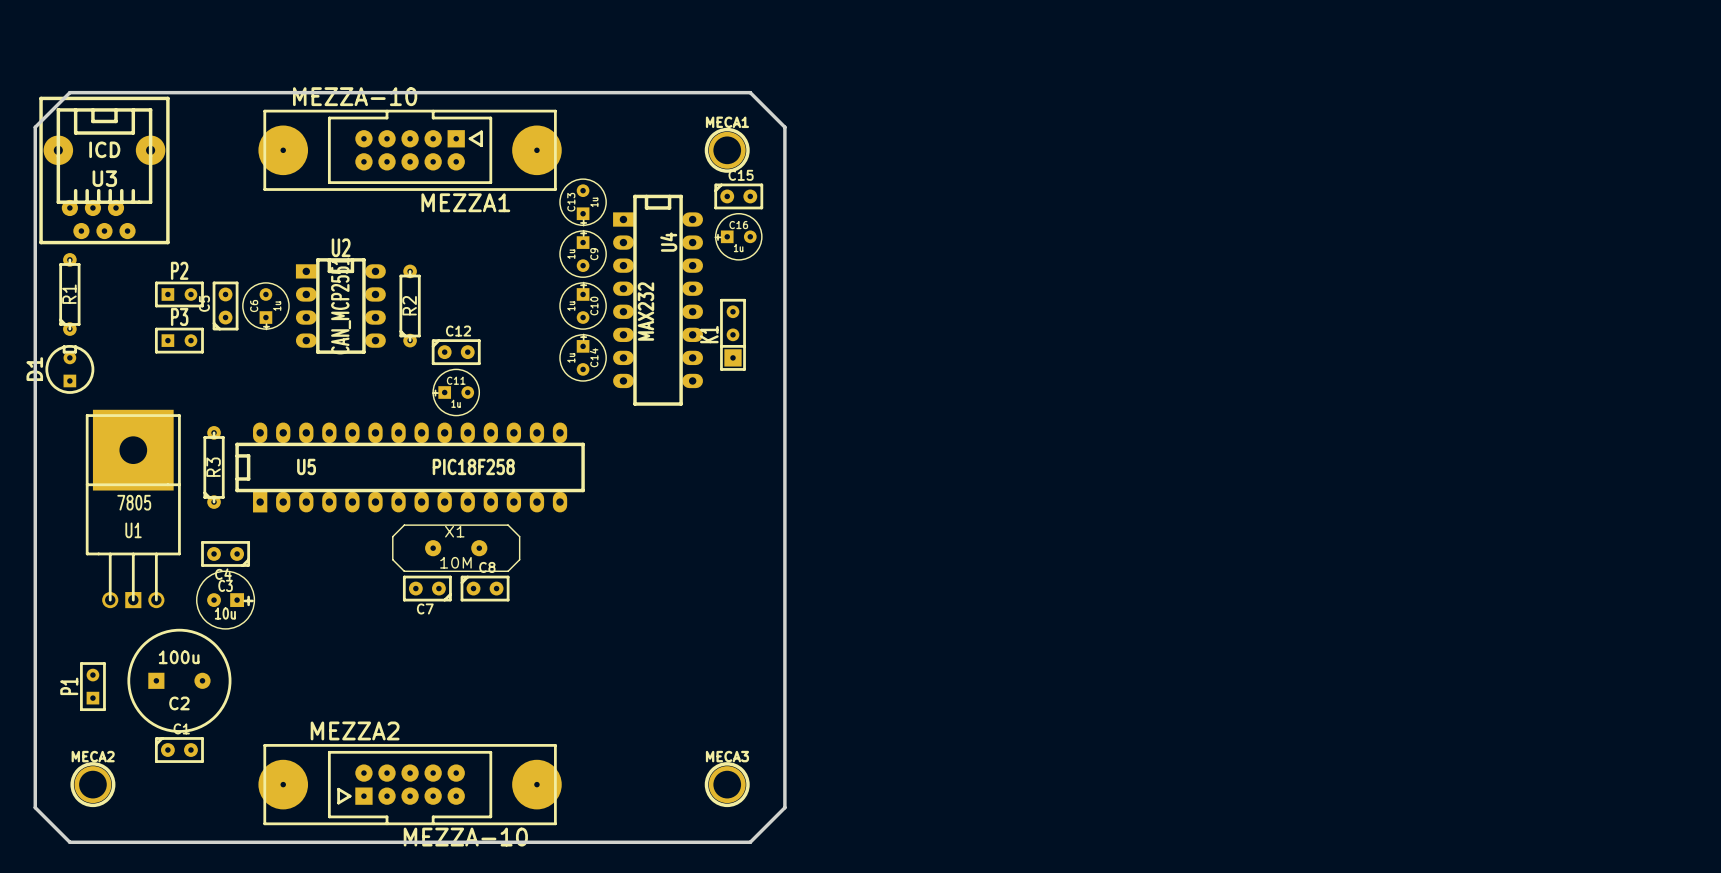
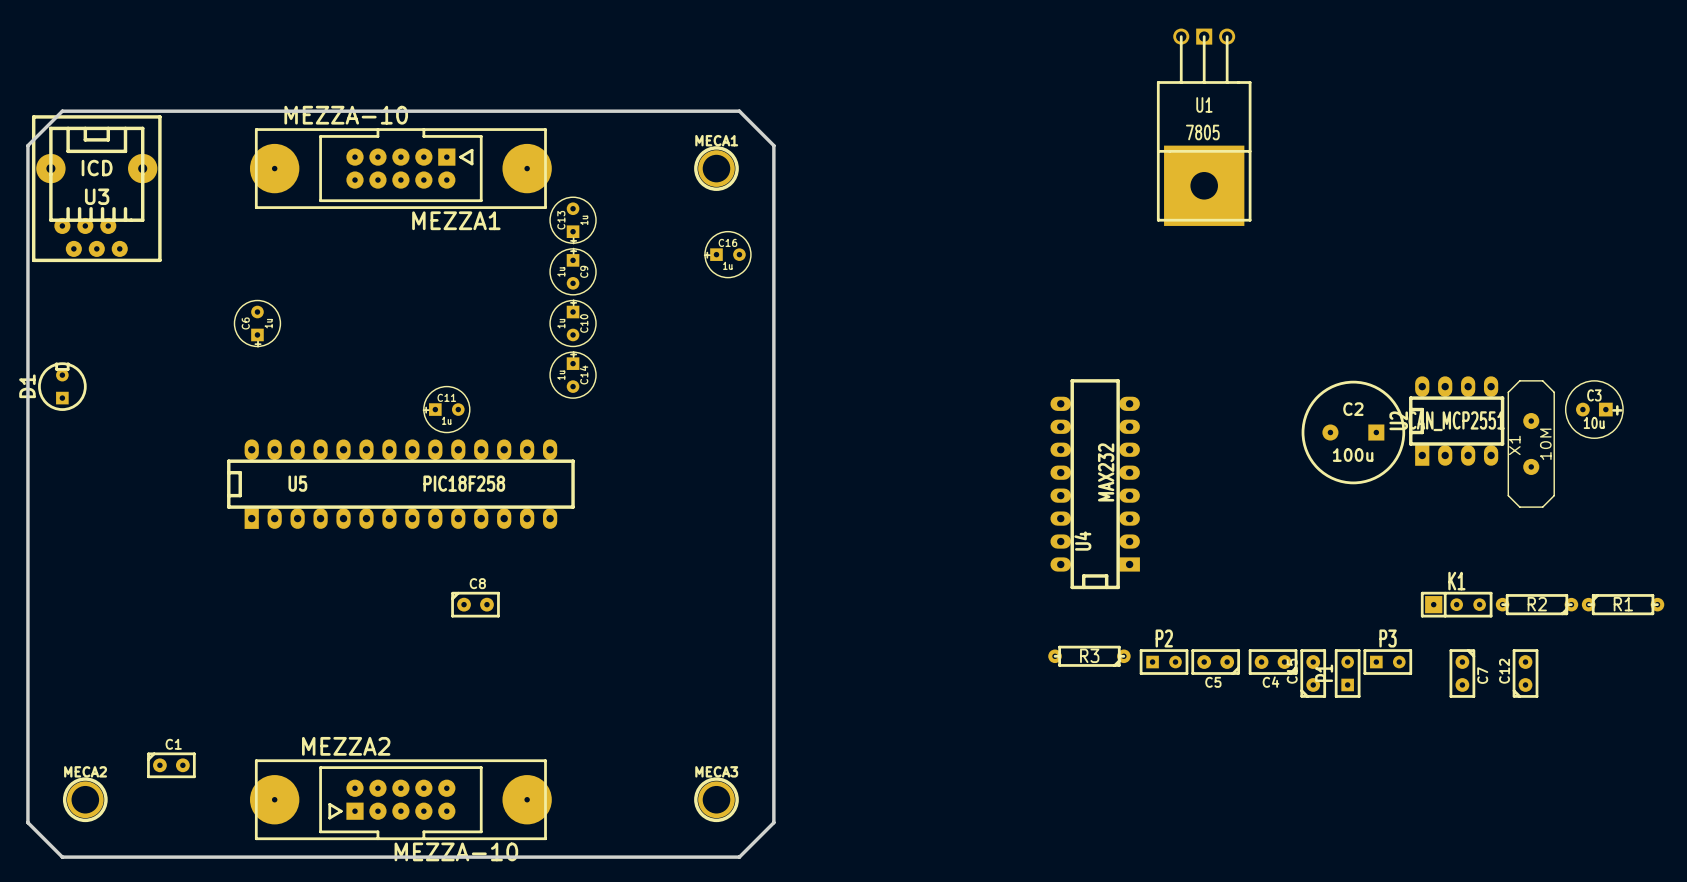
C15 rotation: 0° (738, 196) -> 90° counterclockwise (1313, 673)
C15 position: (738, 196) -> (1313, 673)
R1 rotation: 0° (69, 294) -> 90° clockwise (1623, 604)
R1 position: (69, 294) -> (1623, 604)
P2 position: (179, 294) -> (1164, 662)
U4 rotation: 0° (658, 300) -> 180° (1095, 484)
U4 position: (658, 300) -> (1095, 484)
C5 rotation: 0° (225, 306) -> 90° counterclockwise (1215, 662)
C5 position: (225, 306) -> (1215, 662)
U2 rotation: 0° (340, 306) -> 90° counterclockwise (1456, 421)
U2 position: (340, 306) -> (1456, 421)
R2 rotation: 0° (410, 306) -> 90° counterclockwise (1537, 604)
R2 position: (410, 306) -> (1537, 604)
K1 rotation: 0° (733, 334) -> 90° clockwise (1456, 604)
K1 position: (733, 334) -> (1456, 604)
P3 position: (179, 340) -> (1387, 662)
C12 rotation: 0° (456, 352) -> 90° counterclockwise (1525, 673)
C12 position: (456, 352) -> (1525, 673)
R3 rotation: 0° (214, 467) -> 90° counterclockwise (1089, 656)
R3 position: (214, 467) -> (1089, 656)
U1 rotation: 0° (133, 508) -> 180° (1204, 127)
U1 position: (133, 508) -> (1204, 127)
X1 name position: X1 (454, 531) -> X1 (1514, 445)
X1 rotation: 0° (456, 548) -> 90° clockwise (1531, 443)
X1 position: (456, 548) -> (1531, 443)
C4 position: (225, 553) -> (1273, 662)
X1 value position: 10M (455, 562) -> 10M (1545, 444)
C7 rotation: 0° (427, 588) -> 90° counterclockwise (1462, 673)
C7 position: (427, 588) -> (1462, 673)
C3 position: (225, 600) -> (1594, 409)
C2 rotation: 0° (179, 680) -> 180° (1353, 432)
C2 position: (179, 680) -> (1353, 432)
P1 position: (92, 686) -> (1347, 673)

